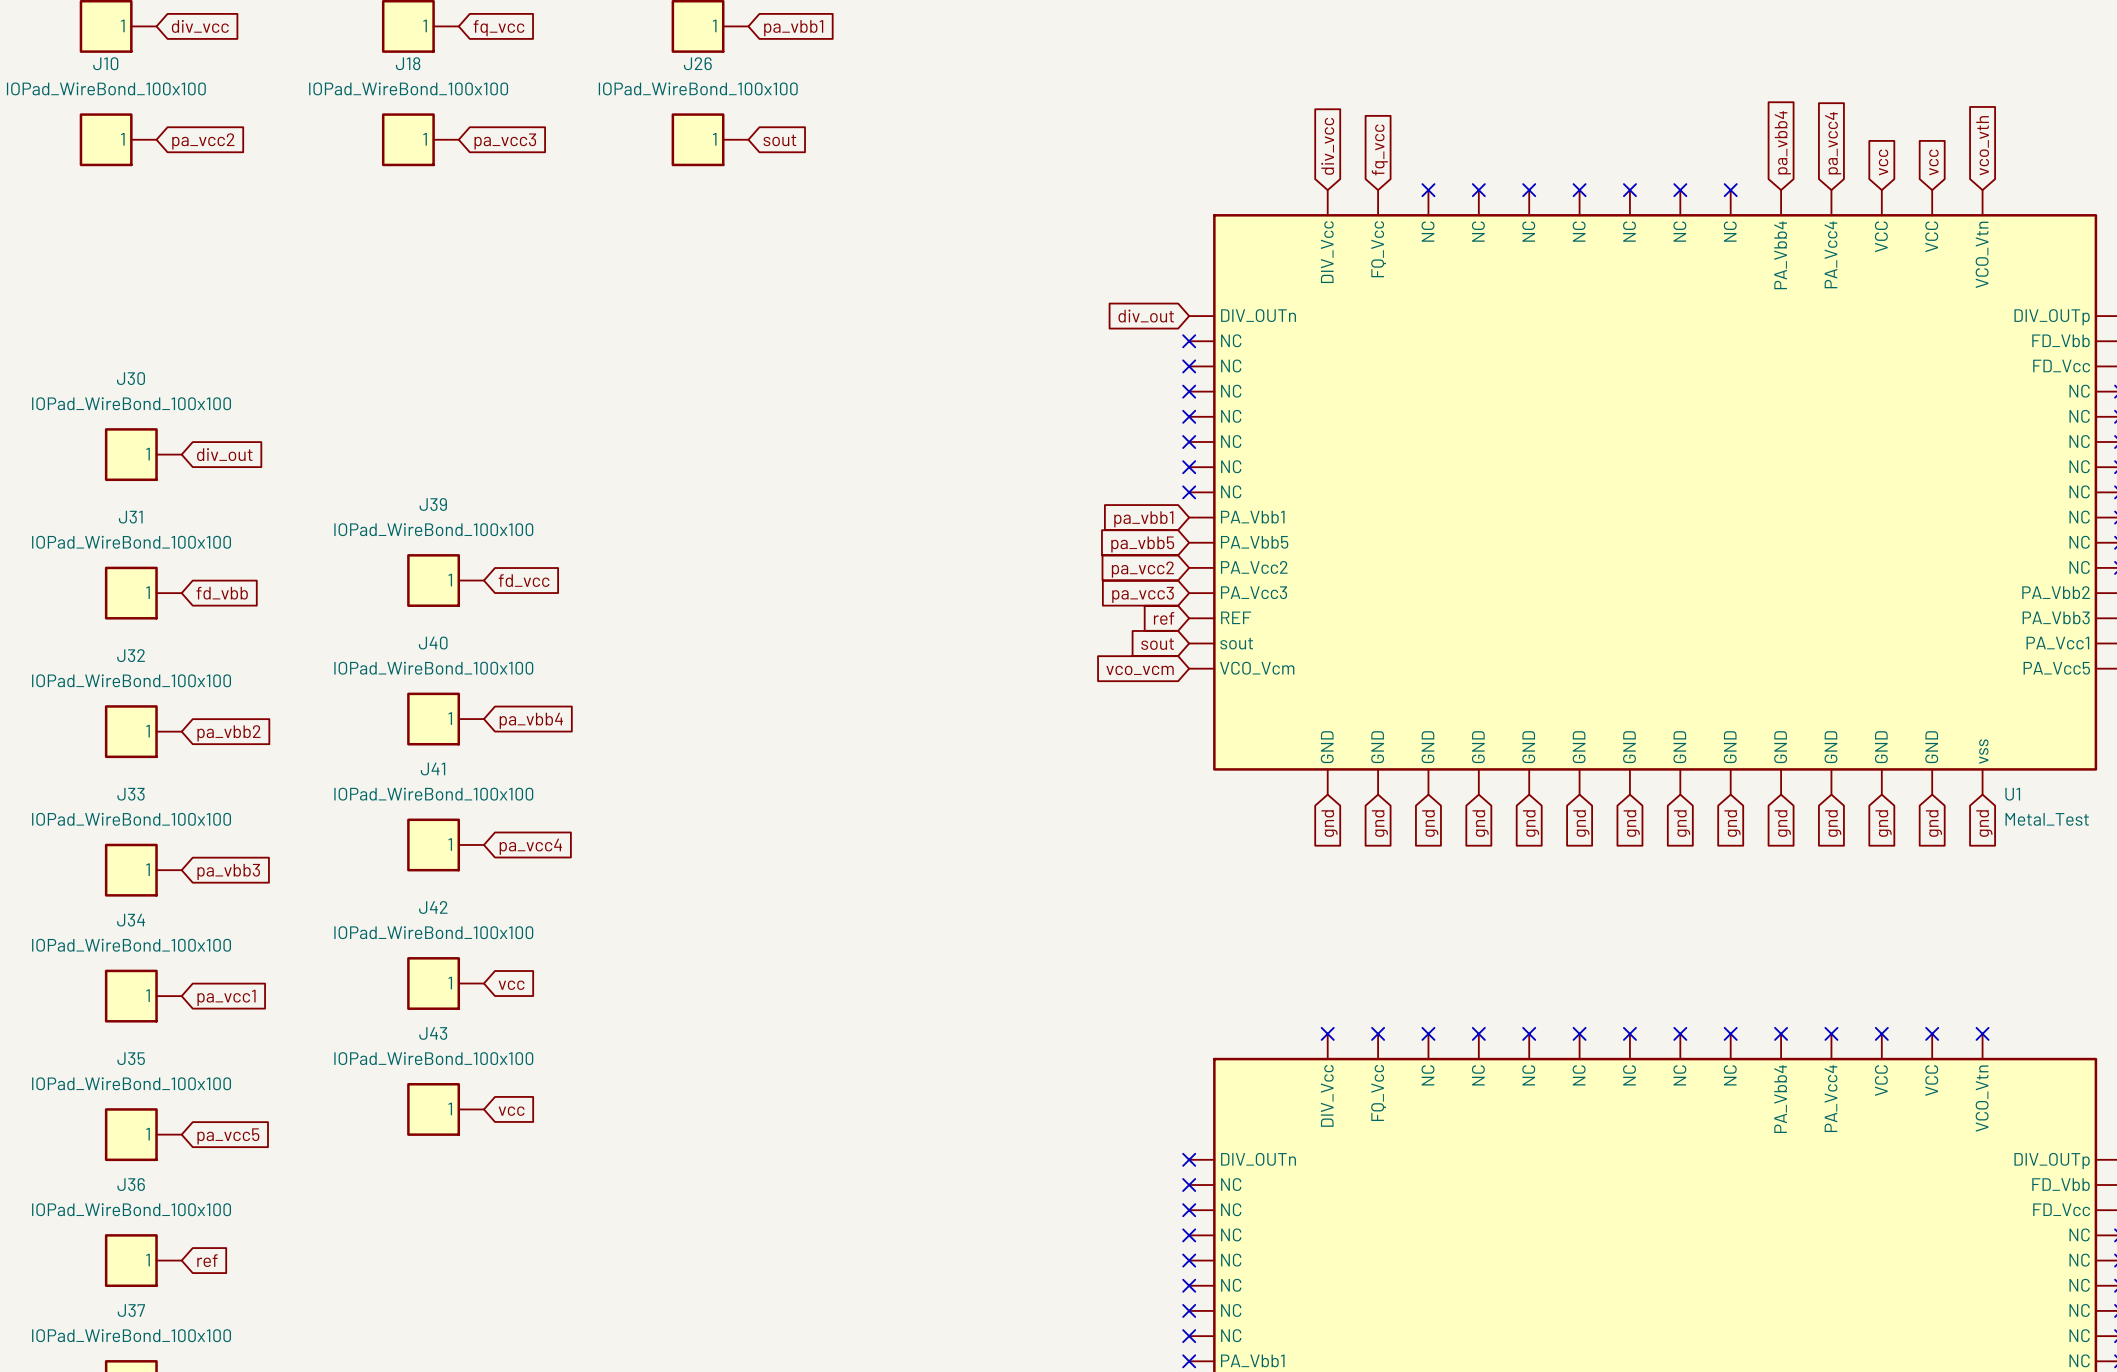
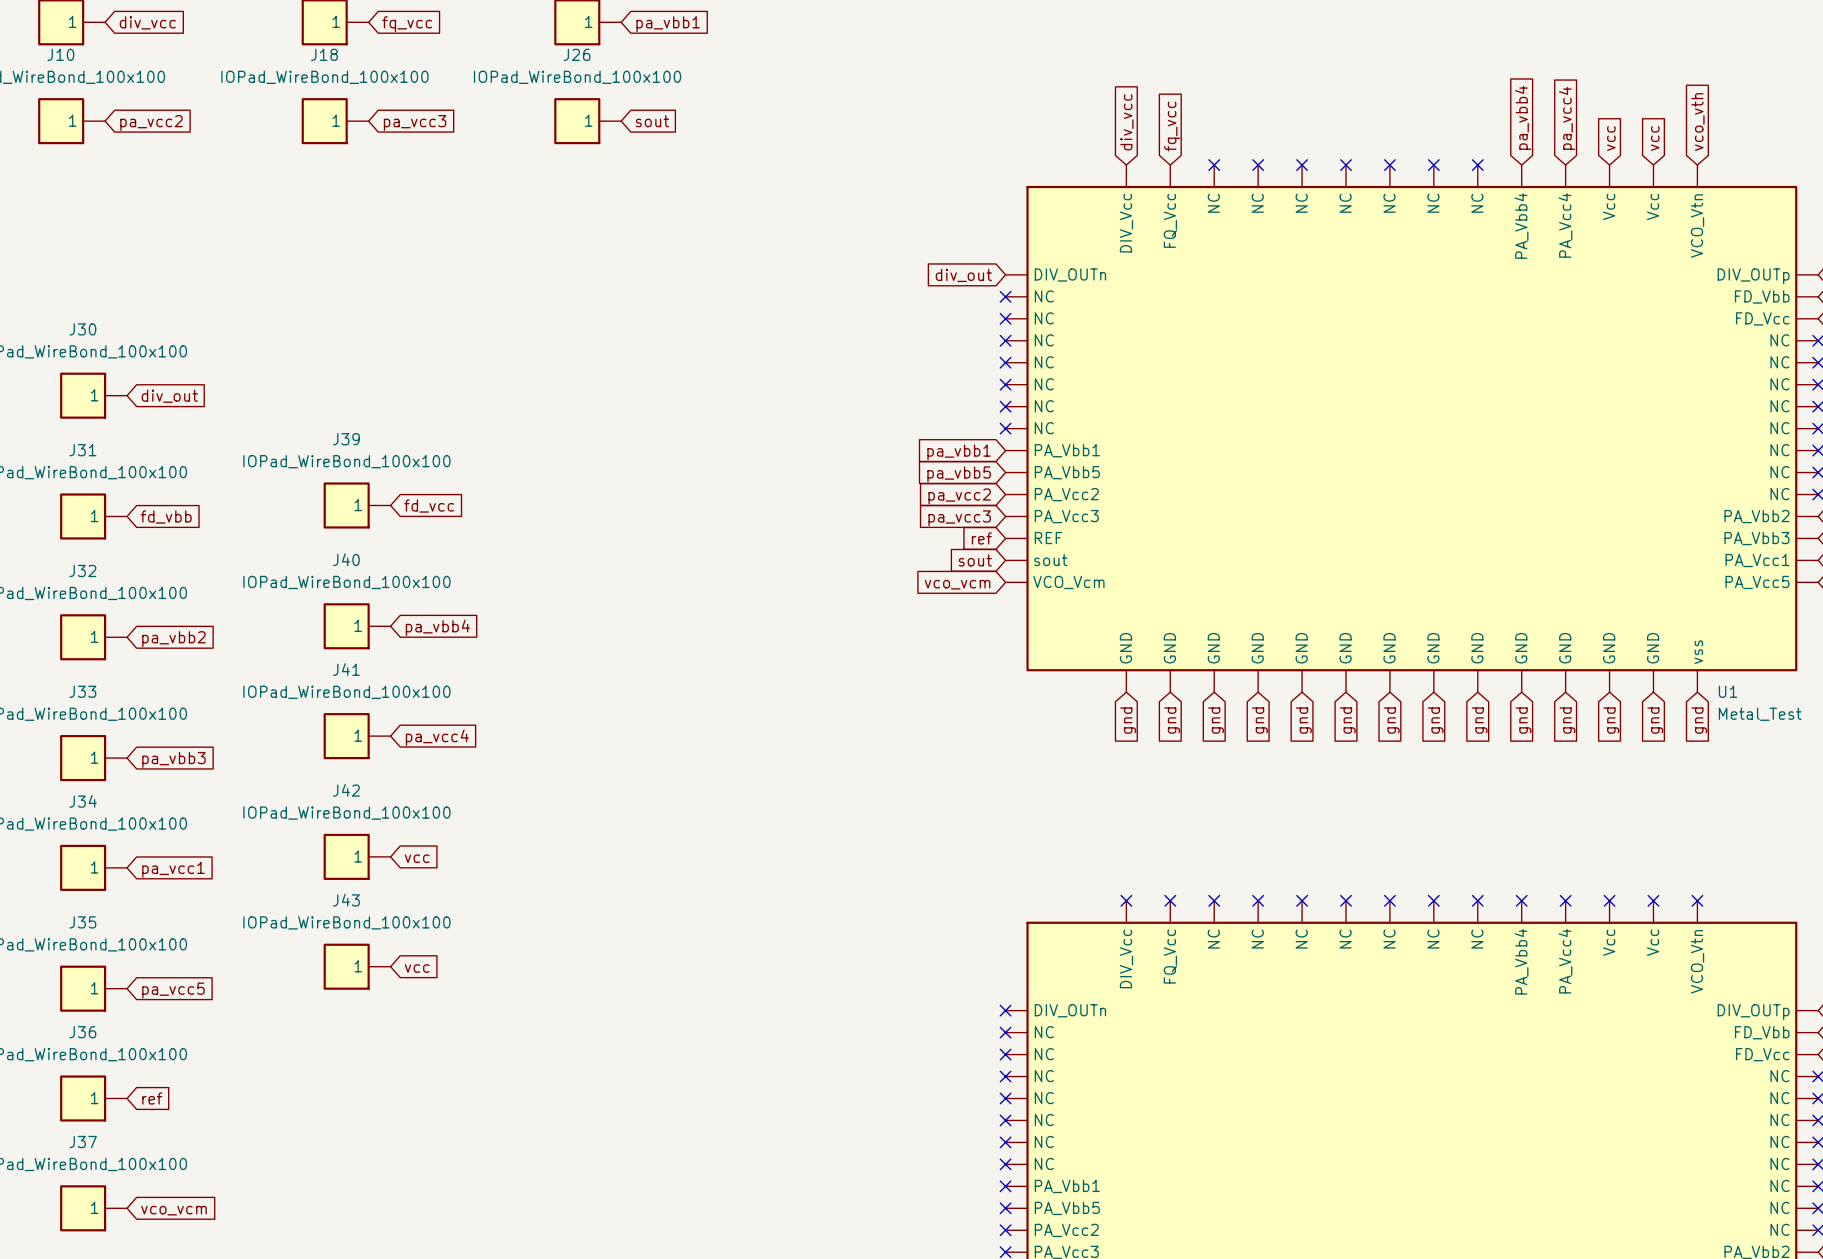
U1 pin name: VCC (1881, 236) -> Vcc (1609, 206)
U1 pin name: VCC (1931, 236) -> Vcc (1653, 206)
part pin name: VCC (1881, 1080) -> Vcc (1609, 942)
part pin name: VCC (1931, 1080) -> Vcc (1653, 942)

